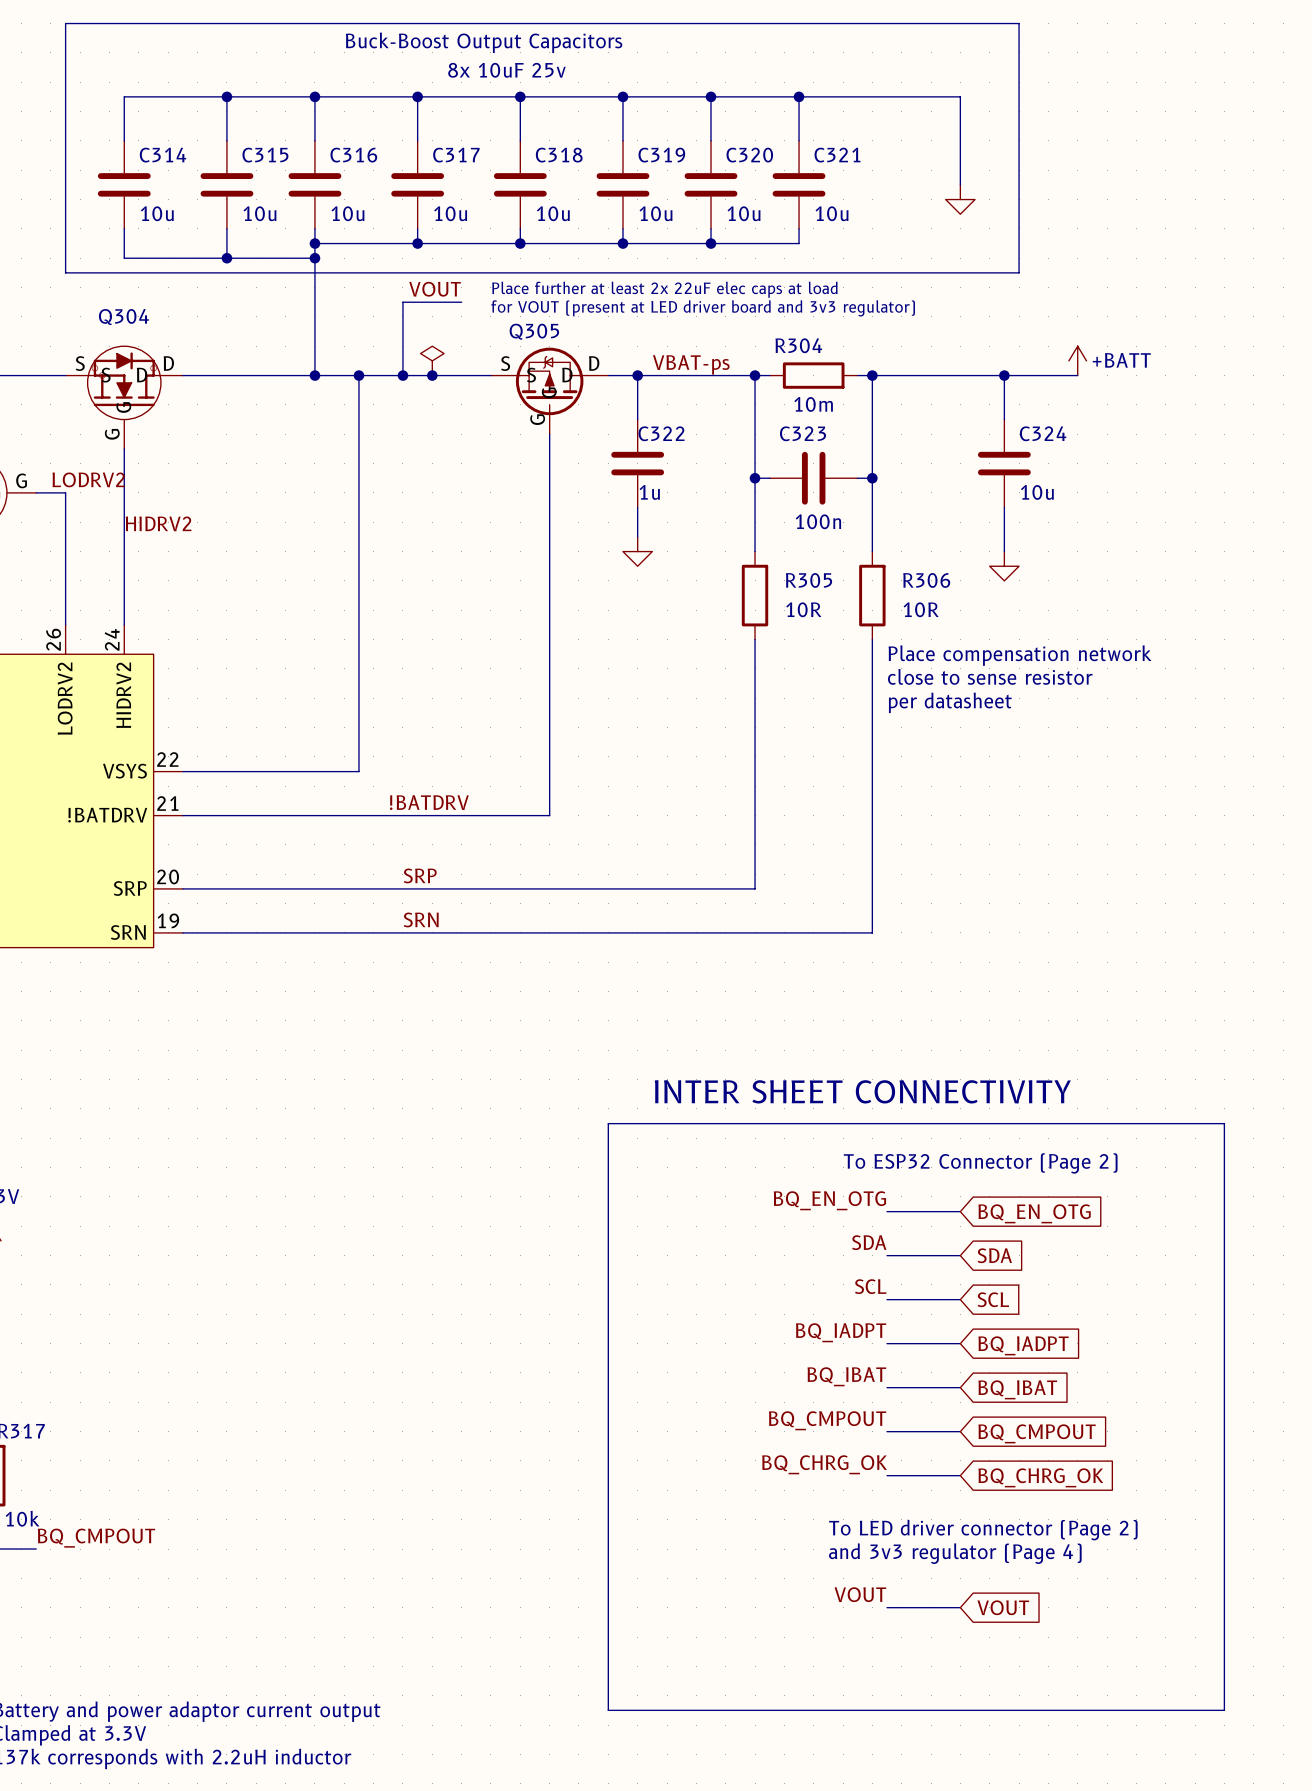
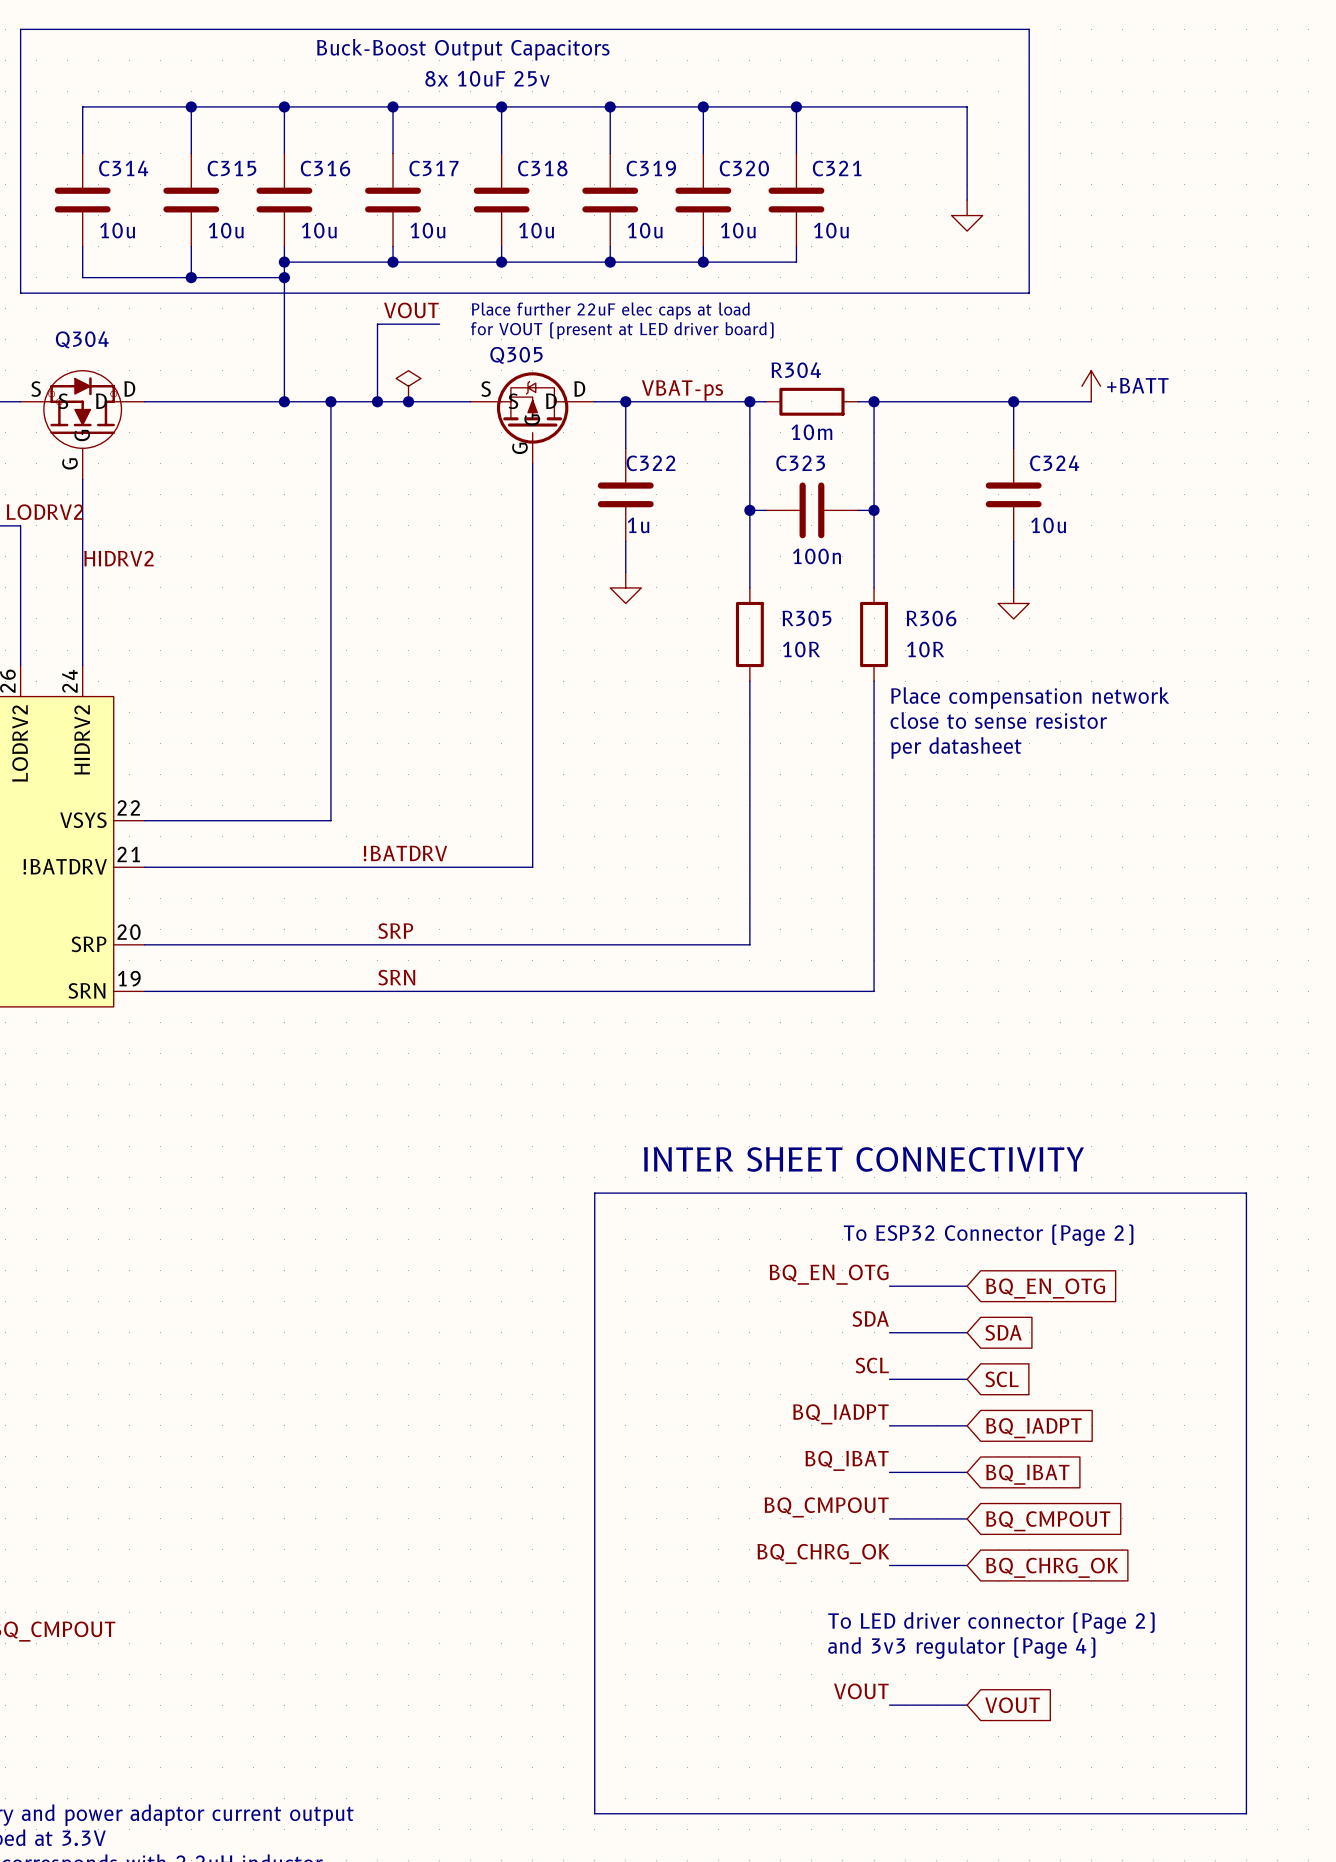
text: Place further at least 2x 22uF elec caps at load (664, 289) -> Place further 22uF elec caps at load (610, 310)
text: for VOUT (present at LED driver board and 3v3 regulator) (703, 308) -> for VOUT (present at LED driver board) (622, 330)

